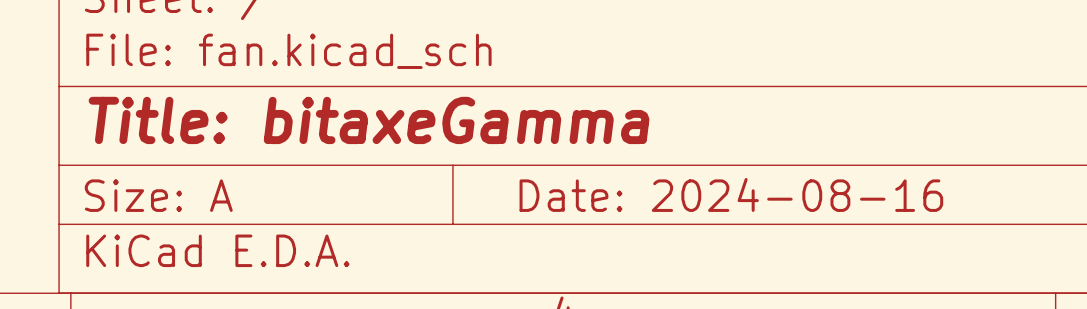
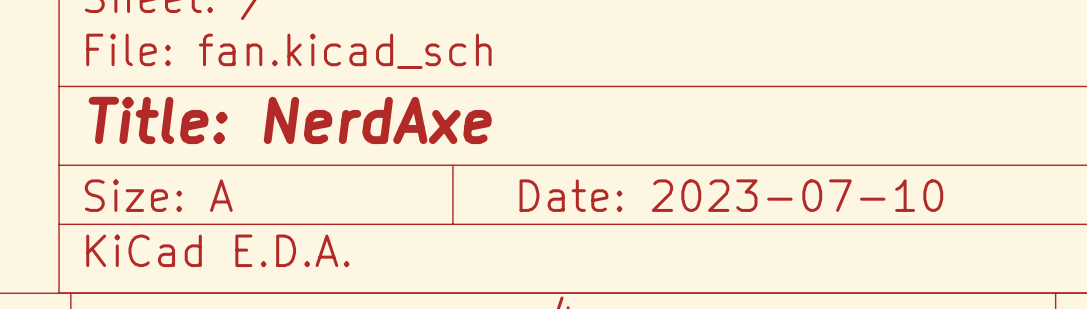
title block: Title: bitaxeGamma (369, 120) -> Title: NerdAxe (290, 120)
title block: Date: 2024-08-16 (731, 194) -> Date: 2023-07-10 (731, 195)

